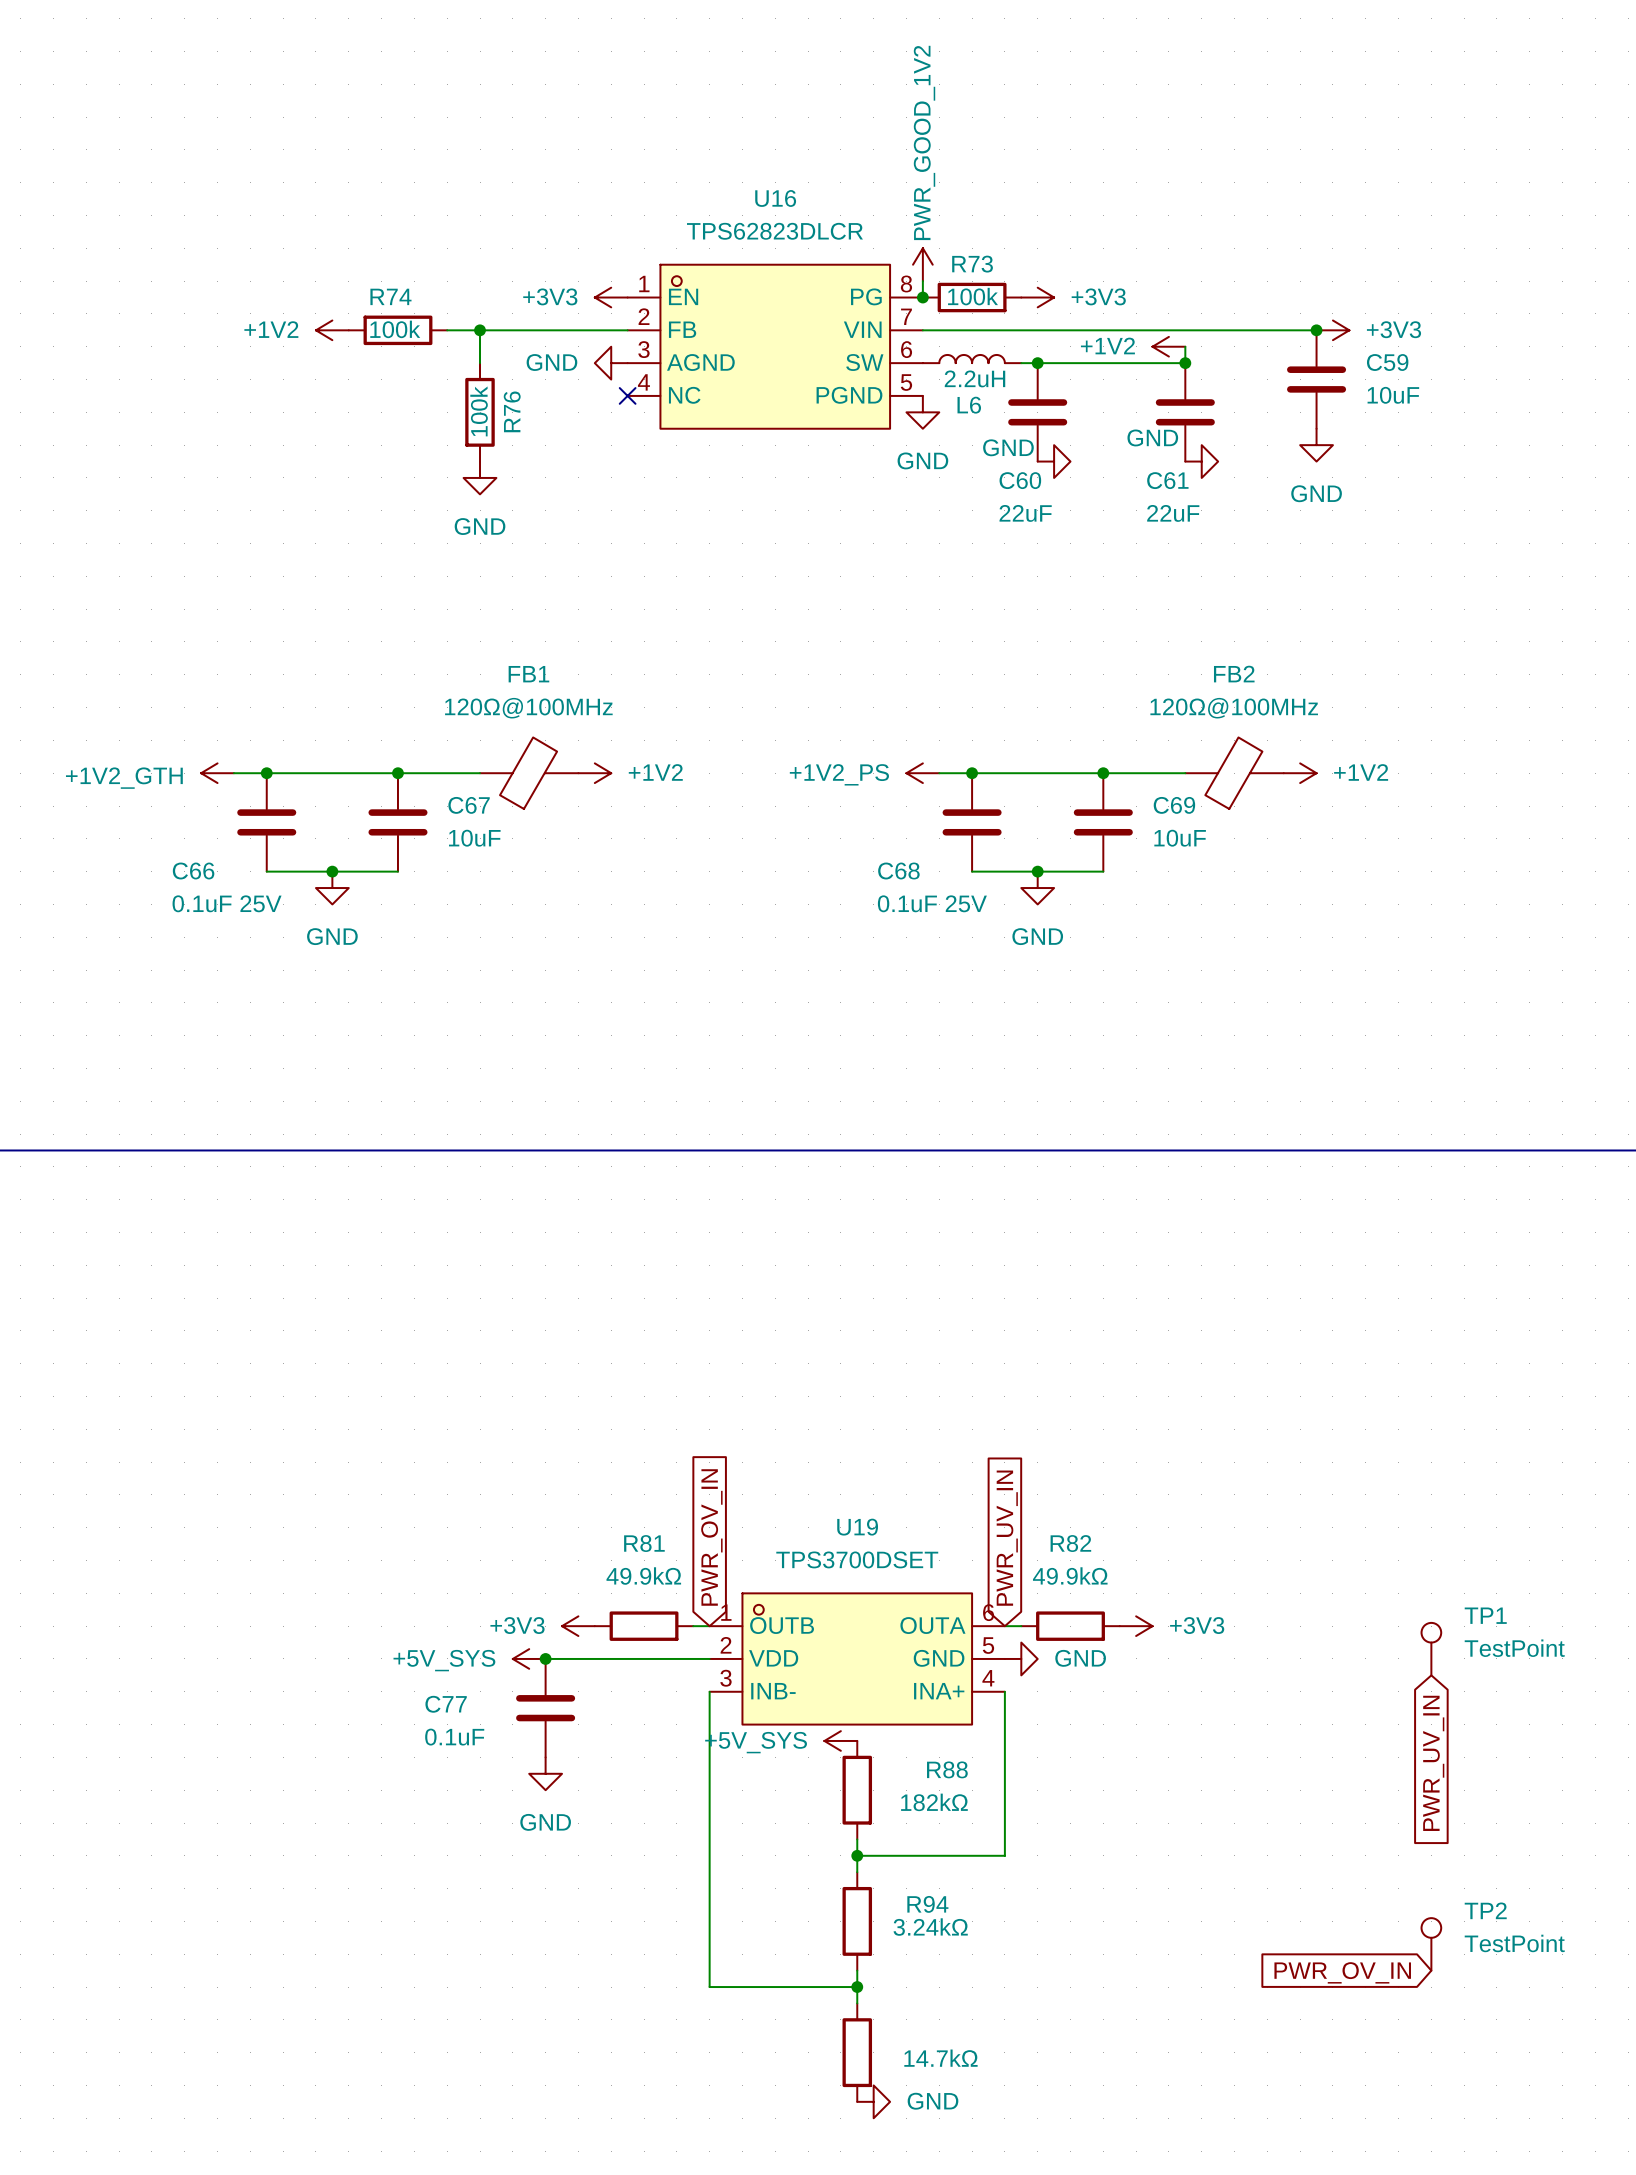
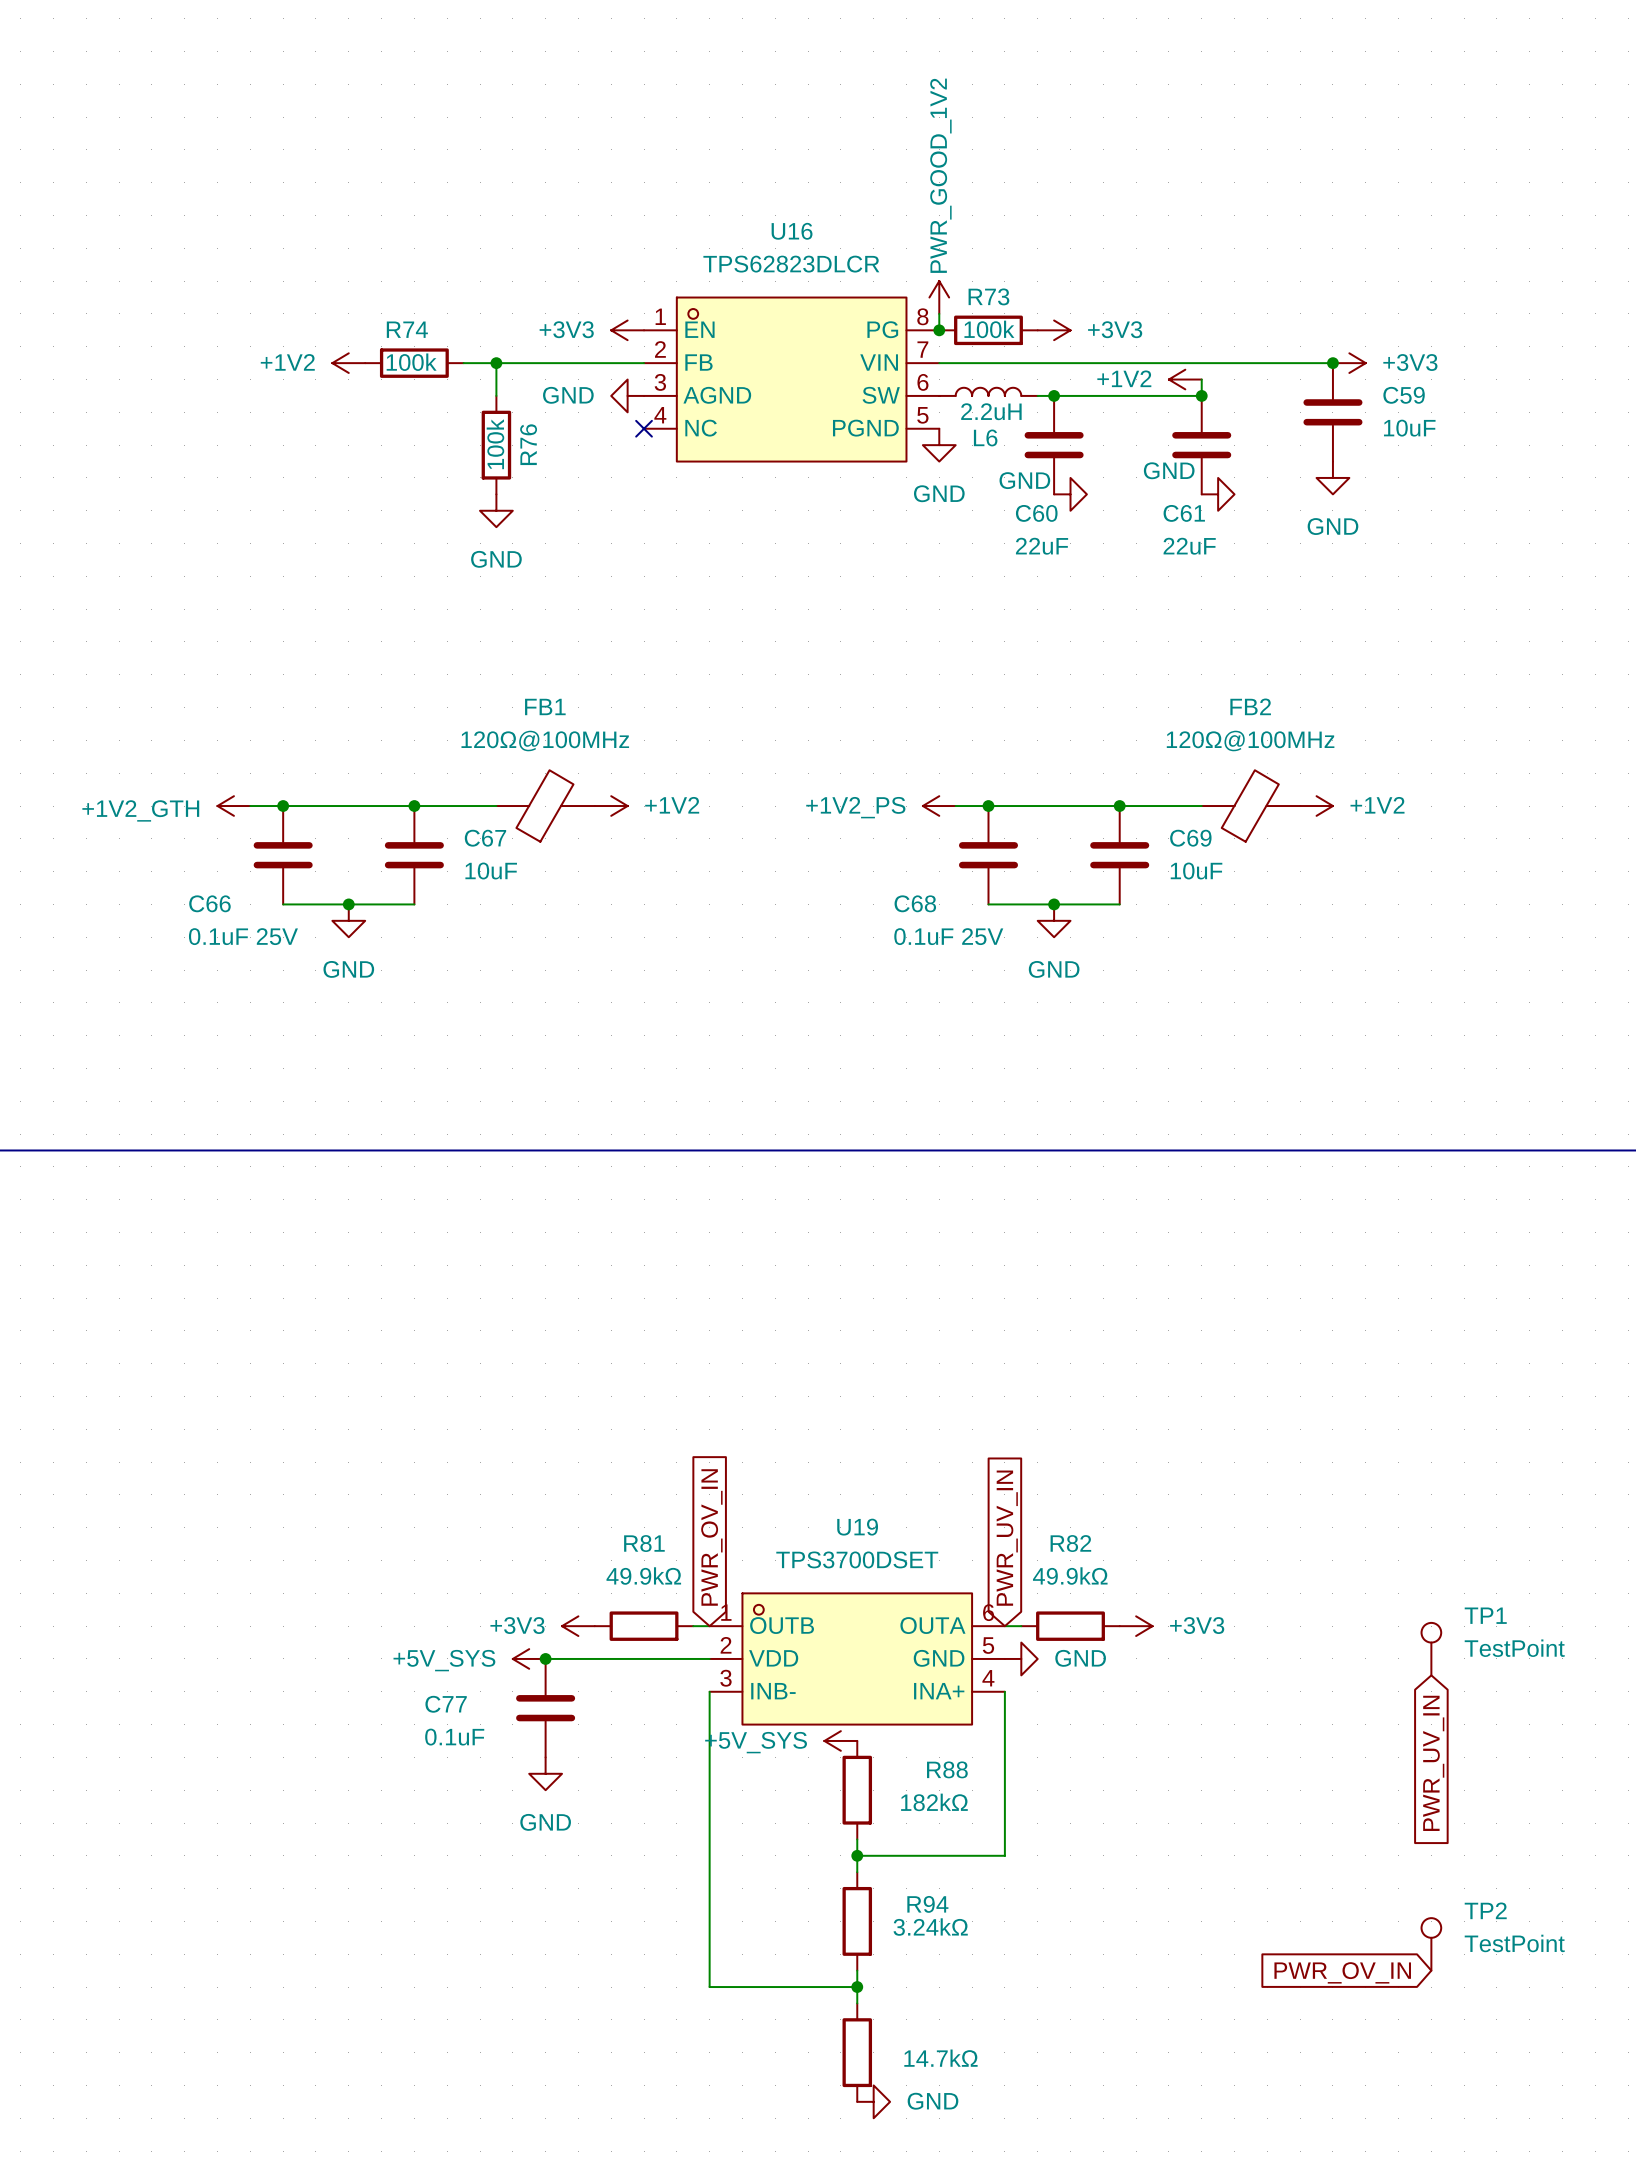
power symbol position: PWR_GOOD_1V2 (922, 264) -> PWR_GOOD_1V2 (939, 297)
wire: (922, 281) (922, 297) -> (939, 313) (939, 330)
power symbol position: +3V3 (611, 297) -> +3V3 (627, 330)
junction position: (922, 297) -> (939, 330)
R73 position: (972, 297) -> (988, 330)
power symbol position: +3V3 (1037, 297) -> +3V3 (1054, 330)
power symbol position: +1V2 (332, 330) -> +1V2 (348, 363)
R74 position: (397, 330) -> (414, 363)
wire: (447, 330) (627, 330) -> (463, 363) (644, 363)
wire: (480, 330) (480, 363) -> (496, 363) (496, 395)
junction position: (480, 330) -> (496, 363)
wire: (922, 330) (1316, 330) -> none
junction position: (1316, 330) -> (1332, 363)
power symbol position: +3V3 (1332, 330) -> +3V3 (1349, 363)
U16 position: (775, 346) -> (791, 379)
power symbol position: +1V2 (1168, 346) -> +1V2 (1185, 379)
wire: (1185, 346) (1185, 363) -> (1332, 363) (1185, 363)
L6 position: (972, 359) -> (988, 391)
power symbol position: GND (611, 363) -> GND (627, 395)
wire: none -> (939, 363) (1021, 363)
junction position: (1037, 363) -> (1054, 395)
junction position: (1185, 363) -> (1201, 395)
wire: none -> (1201, 379) (1201, 395) (1037, 395)
C59 position: (1316, 379) -> (1332, 412)
no-connect mark position: (627, 395) -> (644, 428)
R76 position: (480, 412) -> (496, 445)
power symbol position: GND (922, 412) -> GND (939, 445)
C60 position: (1037, 412) -> (1054, 445)
C61 position: (1185, 412) -> (1201, 445)
power symbol position: GND (1316, 445) -> GND (1332, 477)
power symbol position: GND (1054, 461) -> GND (1070, 494)
power symbol position: GND (1201, 461) -> GND (1218, 494)
power symbol position: GND (480, 477) -> GND (496, 510)
power symbol position: +1V2_GTH (217, 773) -> +1V2_GTH (233, 806)
wire: (233, 773) (480, 773) -> (250, 806) (496, 806)
junction position: (266, 773) -> (283, 806)
junction position: (397, 773) -> (414, 806)
FB1 position: (529, 773) -> (545, 806)
power symbol position: +1V2 (594, 773) -> +1V2 (611, 806)
power symbol position: +1V2_PS (922, 773) -> +1V2_PS (939, 806)
wire: (939, 773) (1185, 773) -> (955, 806) (1201, 806)
junction position: (972, 773) -> (988, 806)
junction position: (1103, 773) -> (1119, 806)
FB2 position: (1234, 773) -> (1250, 806)
power symbol position: +1V2 (1300, 773) -> +1V2 (1316, 806)
C66 position: (266, 822) -> (283, 855)
C67 position: (397, 822) -> (414, 855)
C68 position: (972, 822) -> (988, 855)
C69 position: (1103, 822) -> (1119, 855)
wire: (266, 871) (397, 871) -> (283, 904) (414, 904)
junction position: (332, 871) -> (348, 904)
wire: (972, 871) (1103, 871) -> (988, 904) (1119, 904)
junction position: (1037, 871) -> (1054, 904)
power symbol position: GND (332, 888) -> GND (348, 920)
power symbol position: GND (1037, 888) -> GND (1054, 920)

